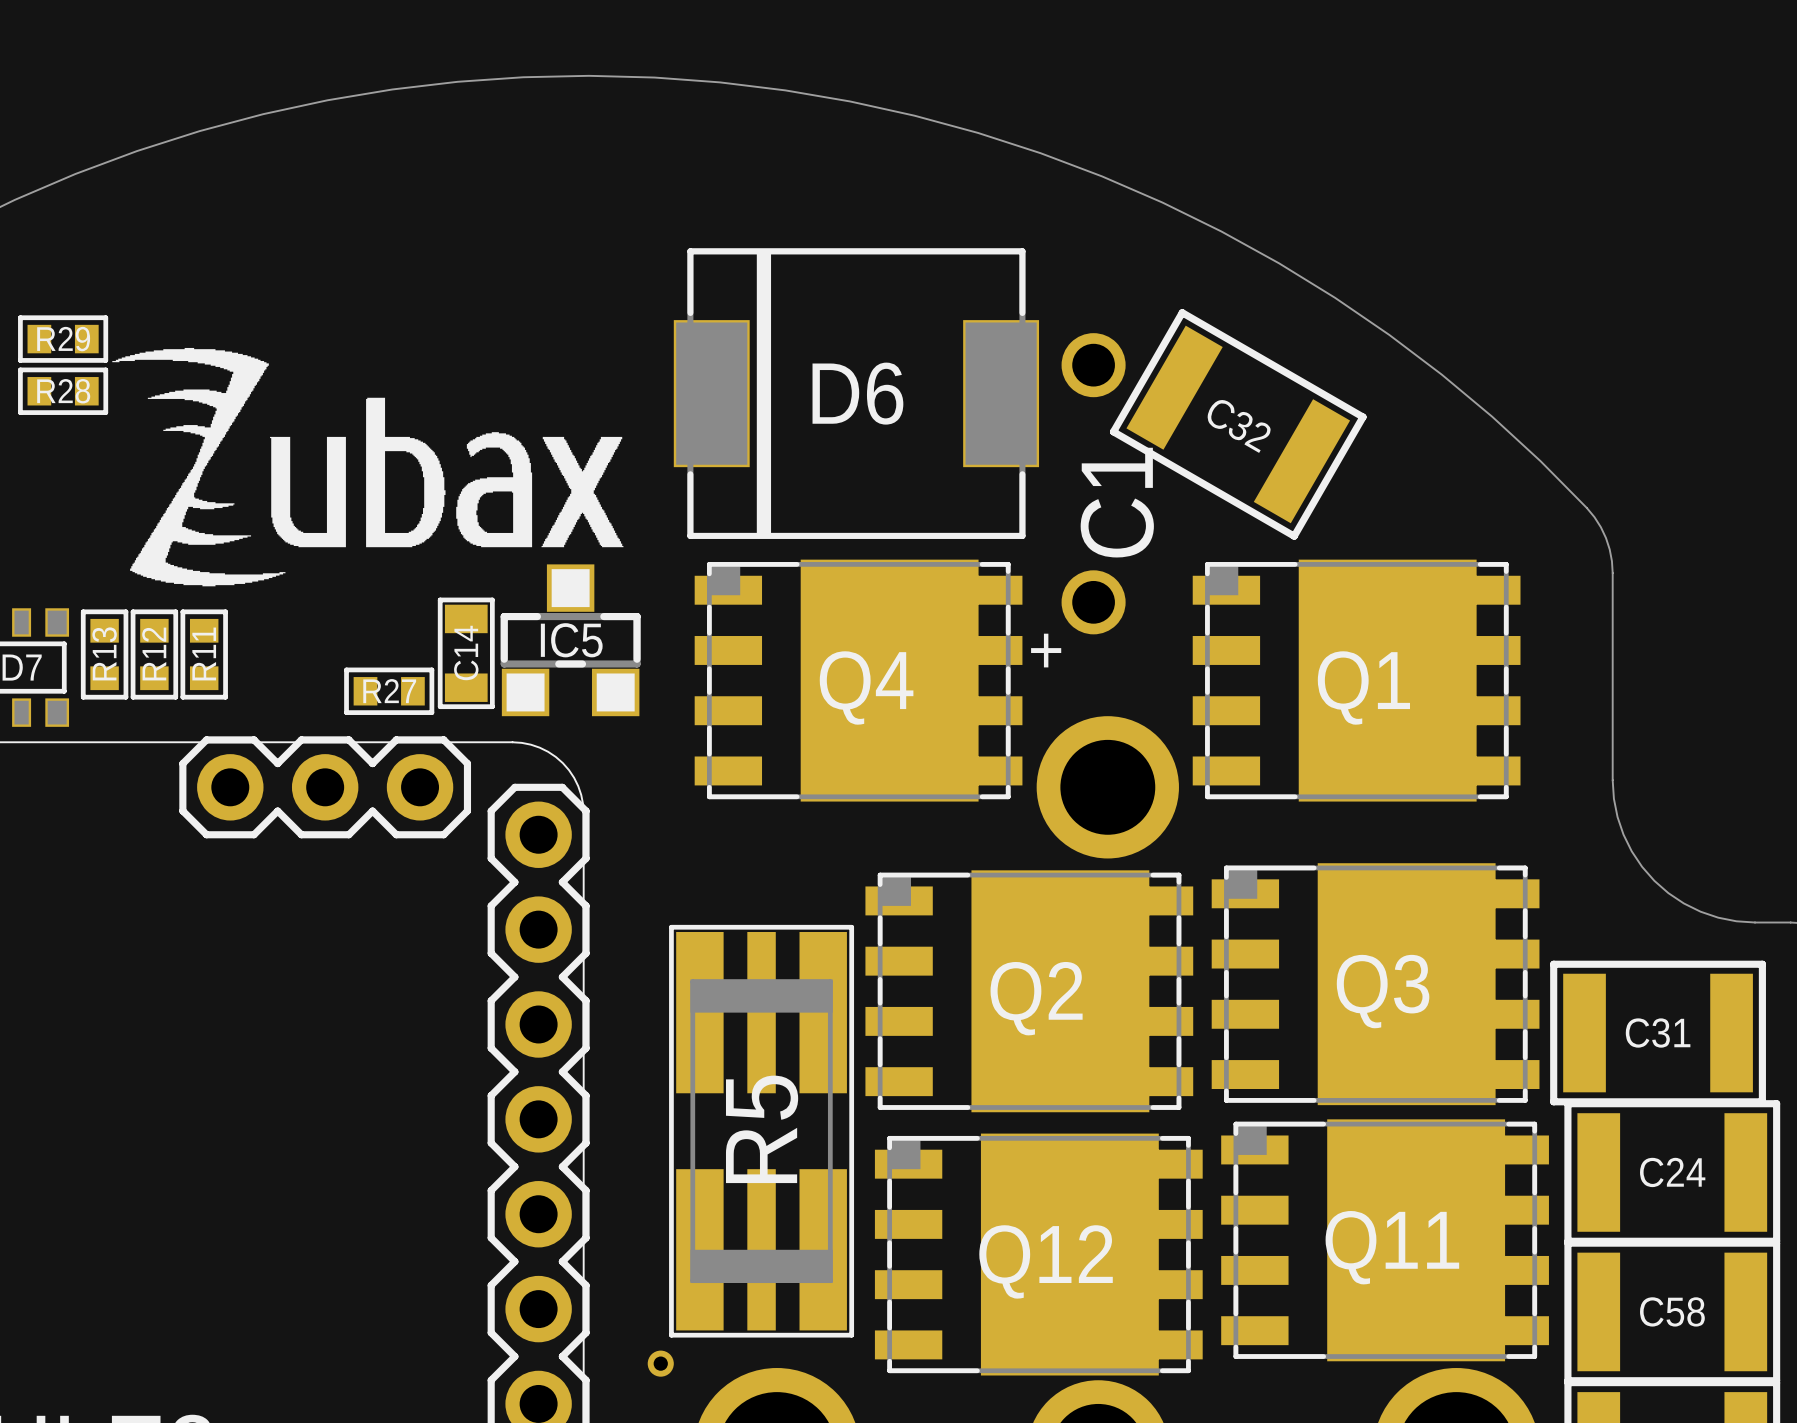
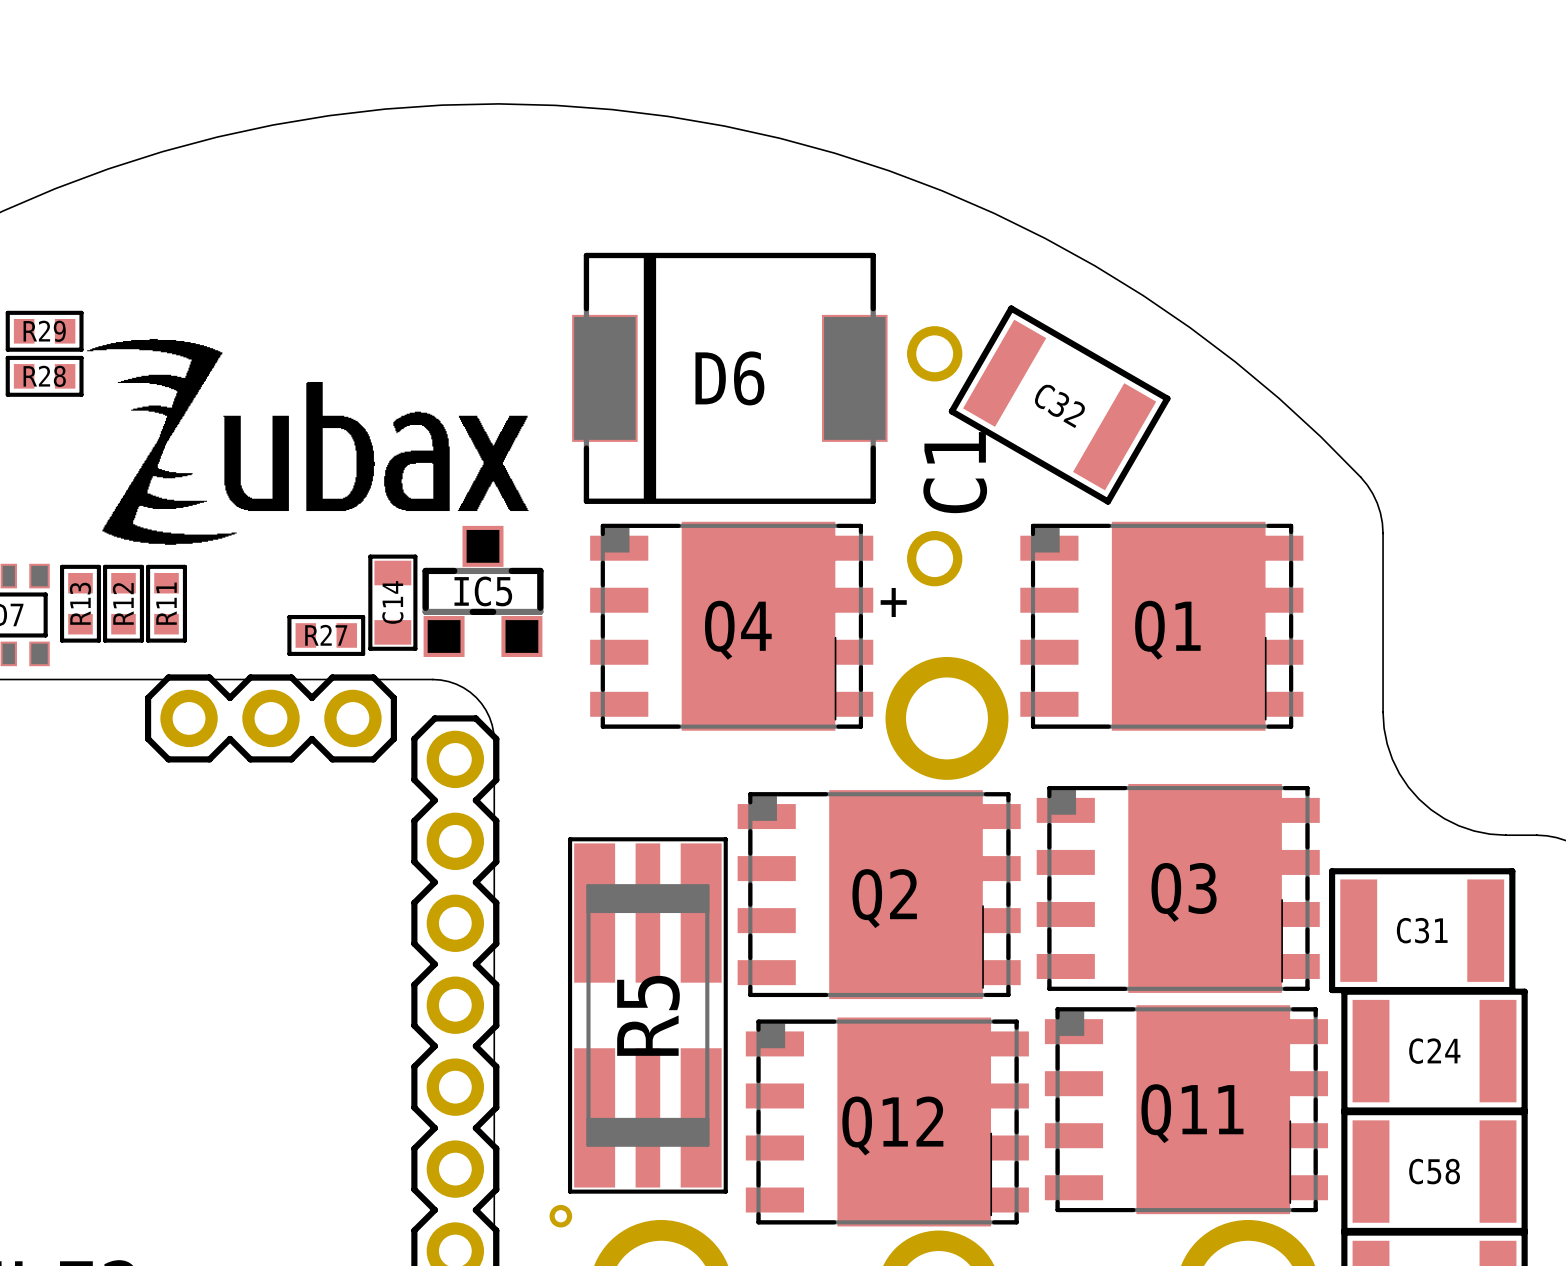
Q4 footprint: [694, 559, 1023, 802] -> [590, 521, 874, 731]
Q1 footprint: [1192, 559, 1521, 802] -> [1020, 521, 1304, 731]
Q3 footprint: [1211, 863, 1540, 1106] -> [1036, 783, 1320, 993]
Q2 footprint: [865, 870, 1194, 1113] -> [737, 790, 1021, 1000]
Q11 footprint: [1221, 1119, 1549, 1362] -> [1044, 1005, 1328, 1215]
Q12 footprint: [874, 1133, 1203, 1376] -> [745, 1017, 1029, 1227]

